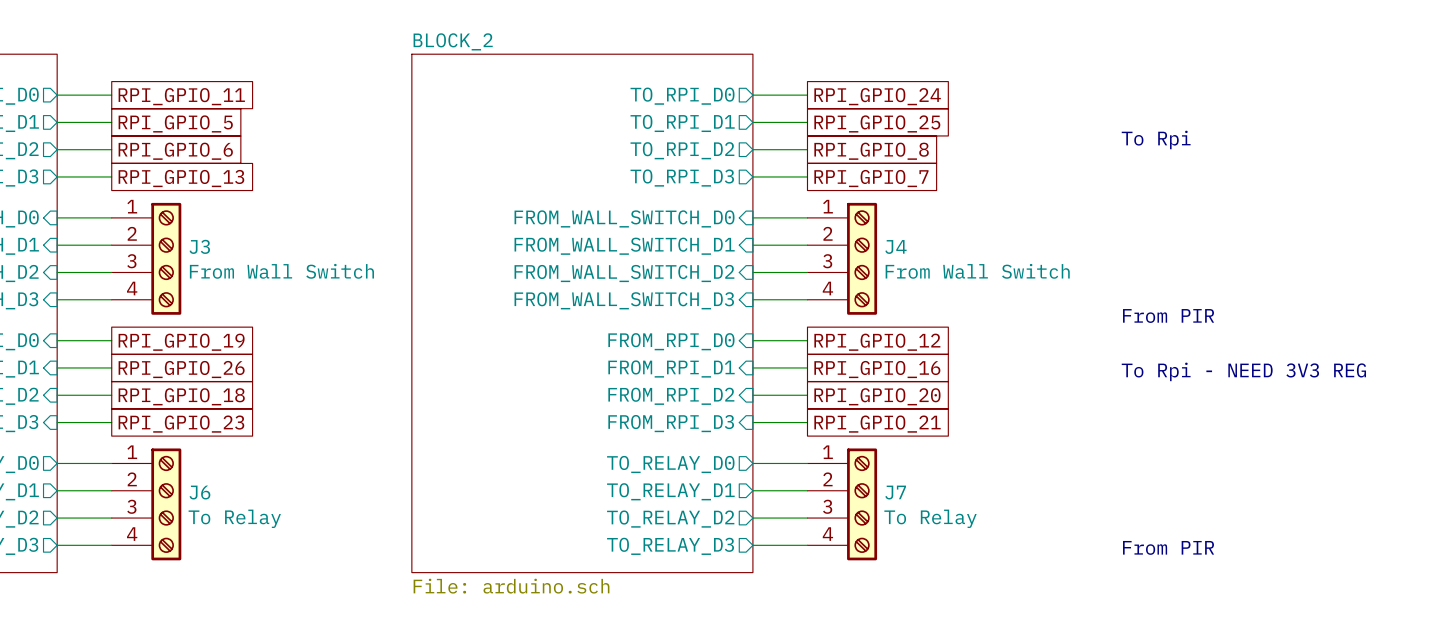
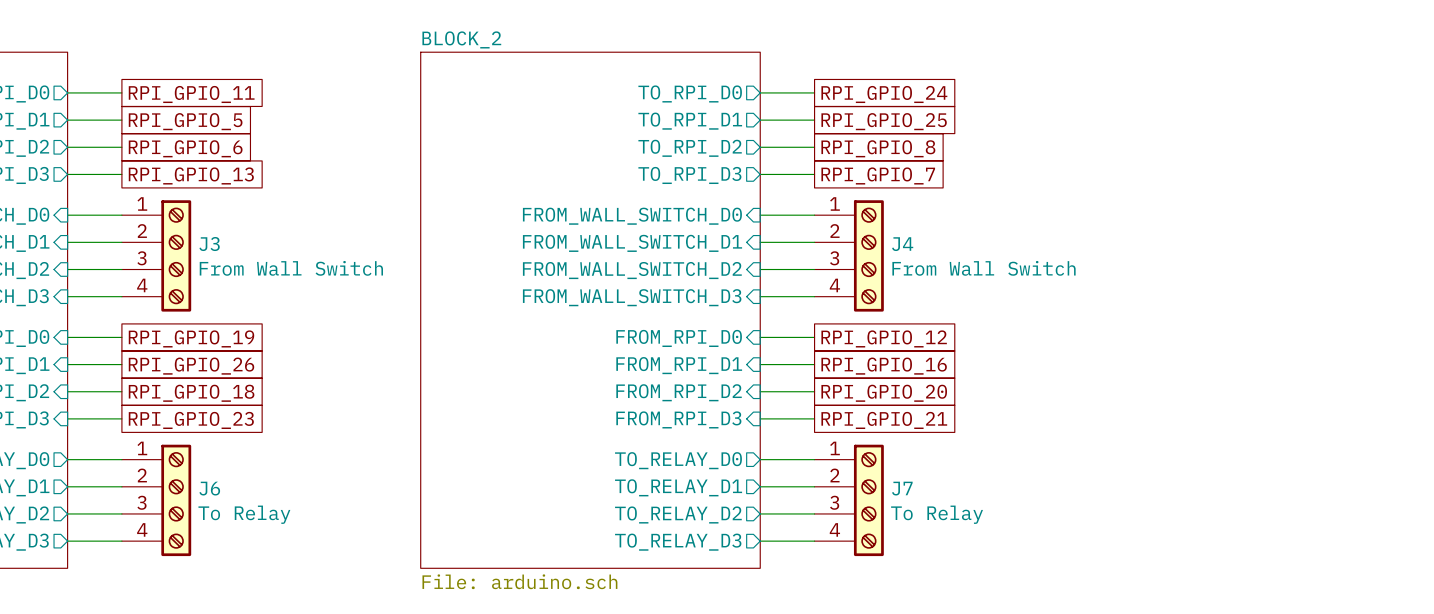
text: To Rpi (1156, 139) -> none
text: From PIR (1168, 315) -> none
text: To Rpi - NEED 3V3 REG (1243, 371) -> none
text: From PIR (1168, 547) -> none

